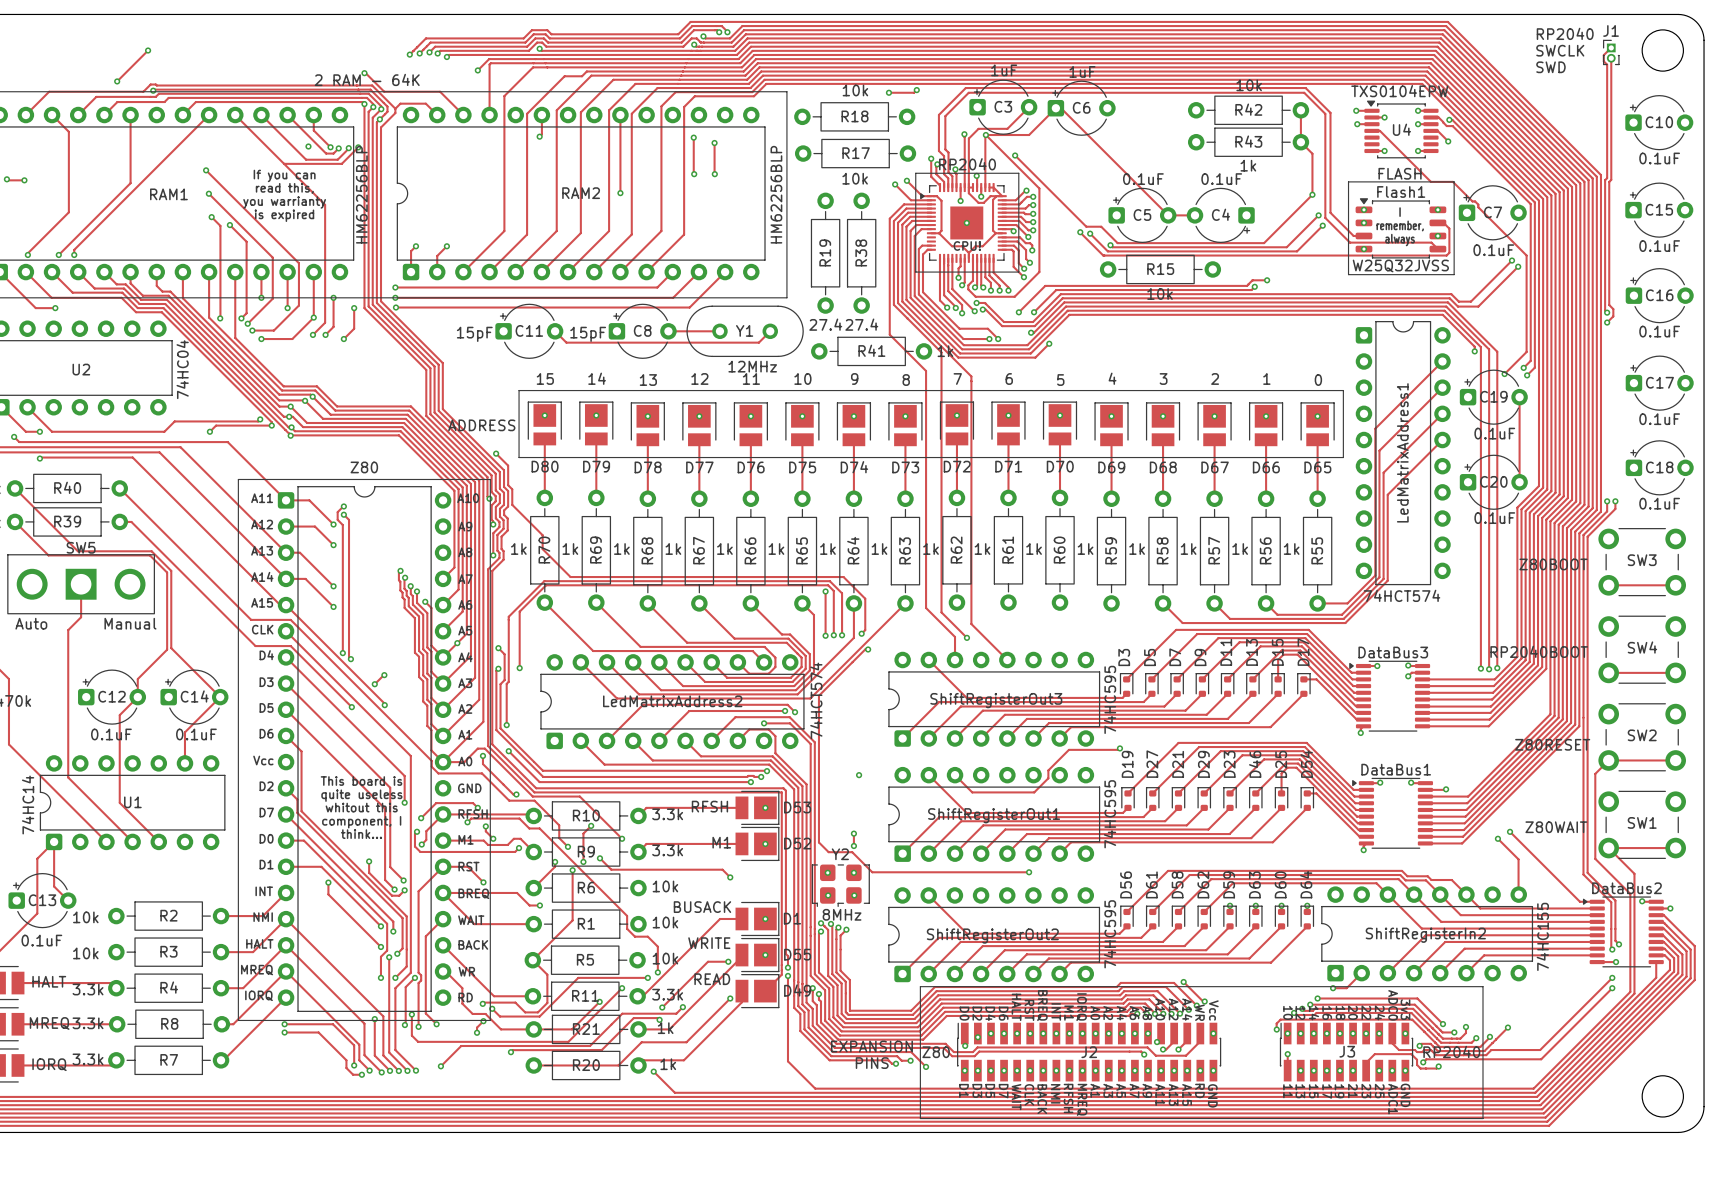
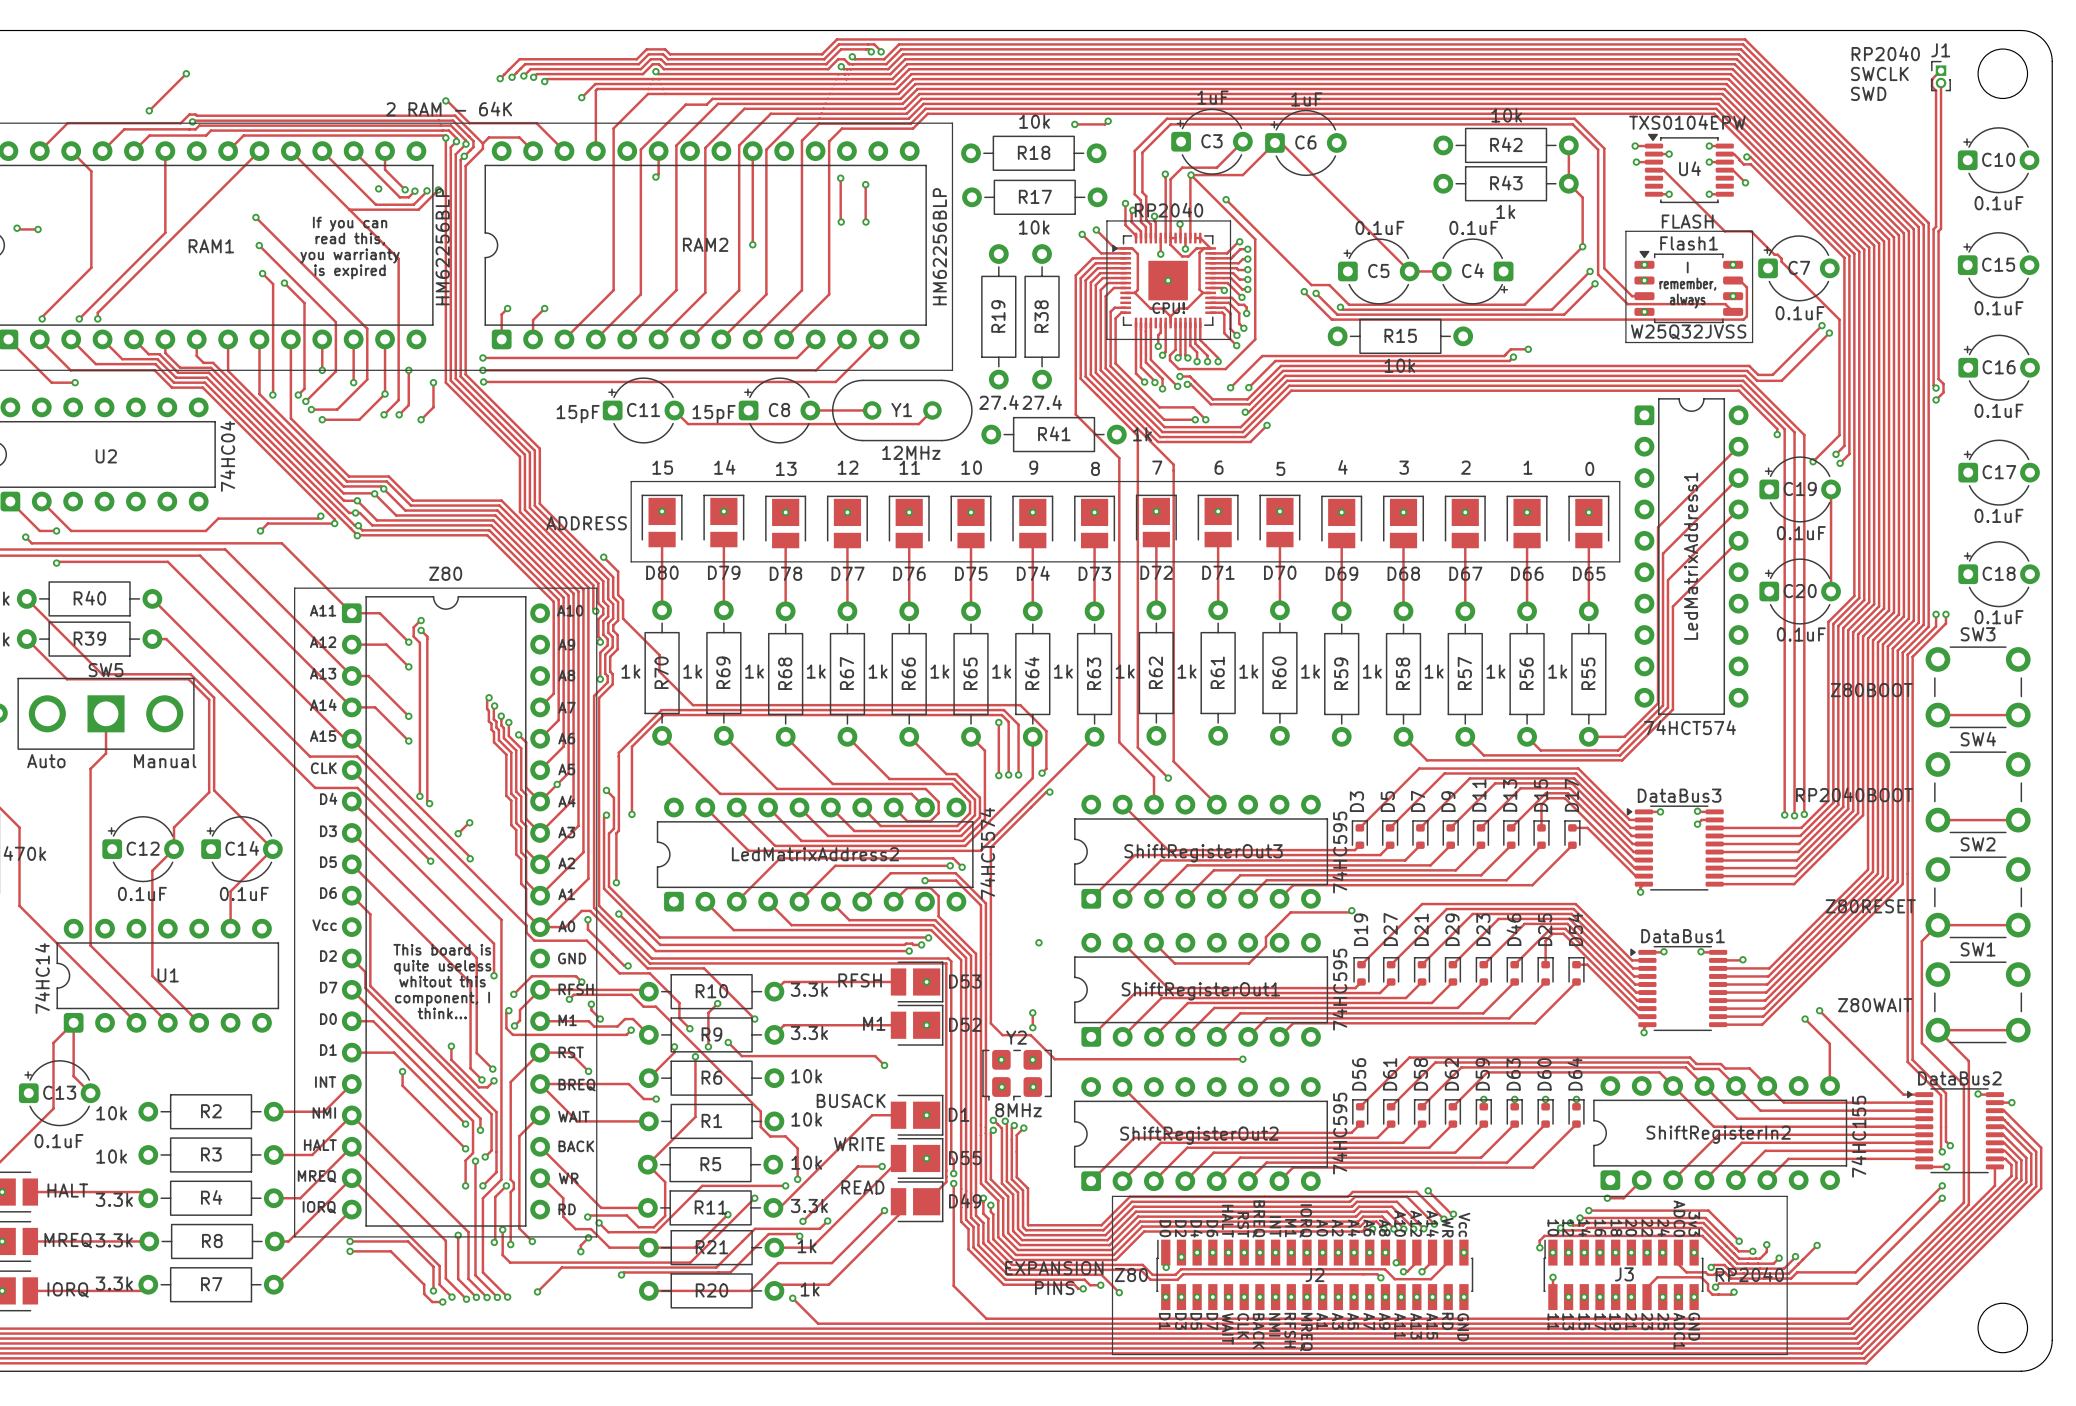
SW3 name position: SW3 (1642, 560) -> SW3 (1978, 634)
SW4 name position: SW4 (1642, 647) -> SW4 (1978, 739)
SW2 name position: SW2 (1642, 735) -> SW2 (1978, 844)
SW1 name position: SW1 (1642, 822) -> SW1 (1978, 949)

